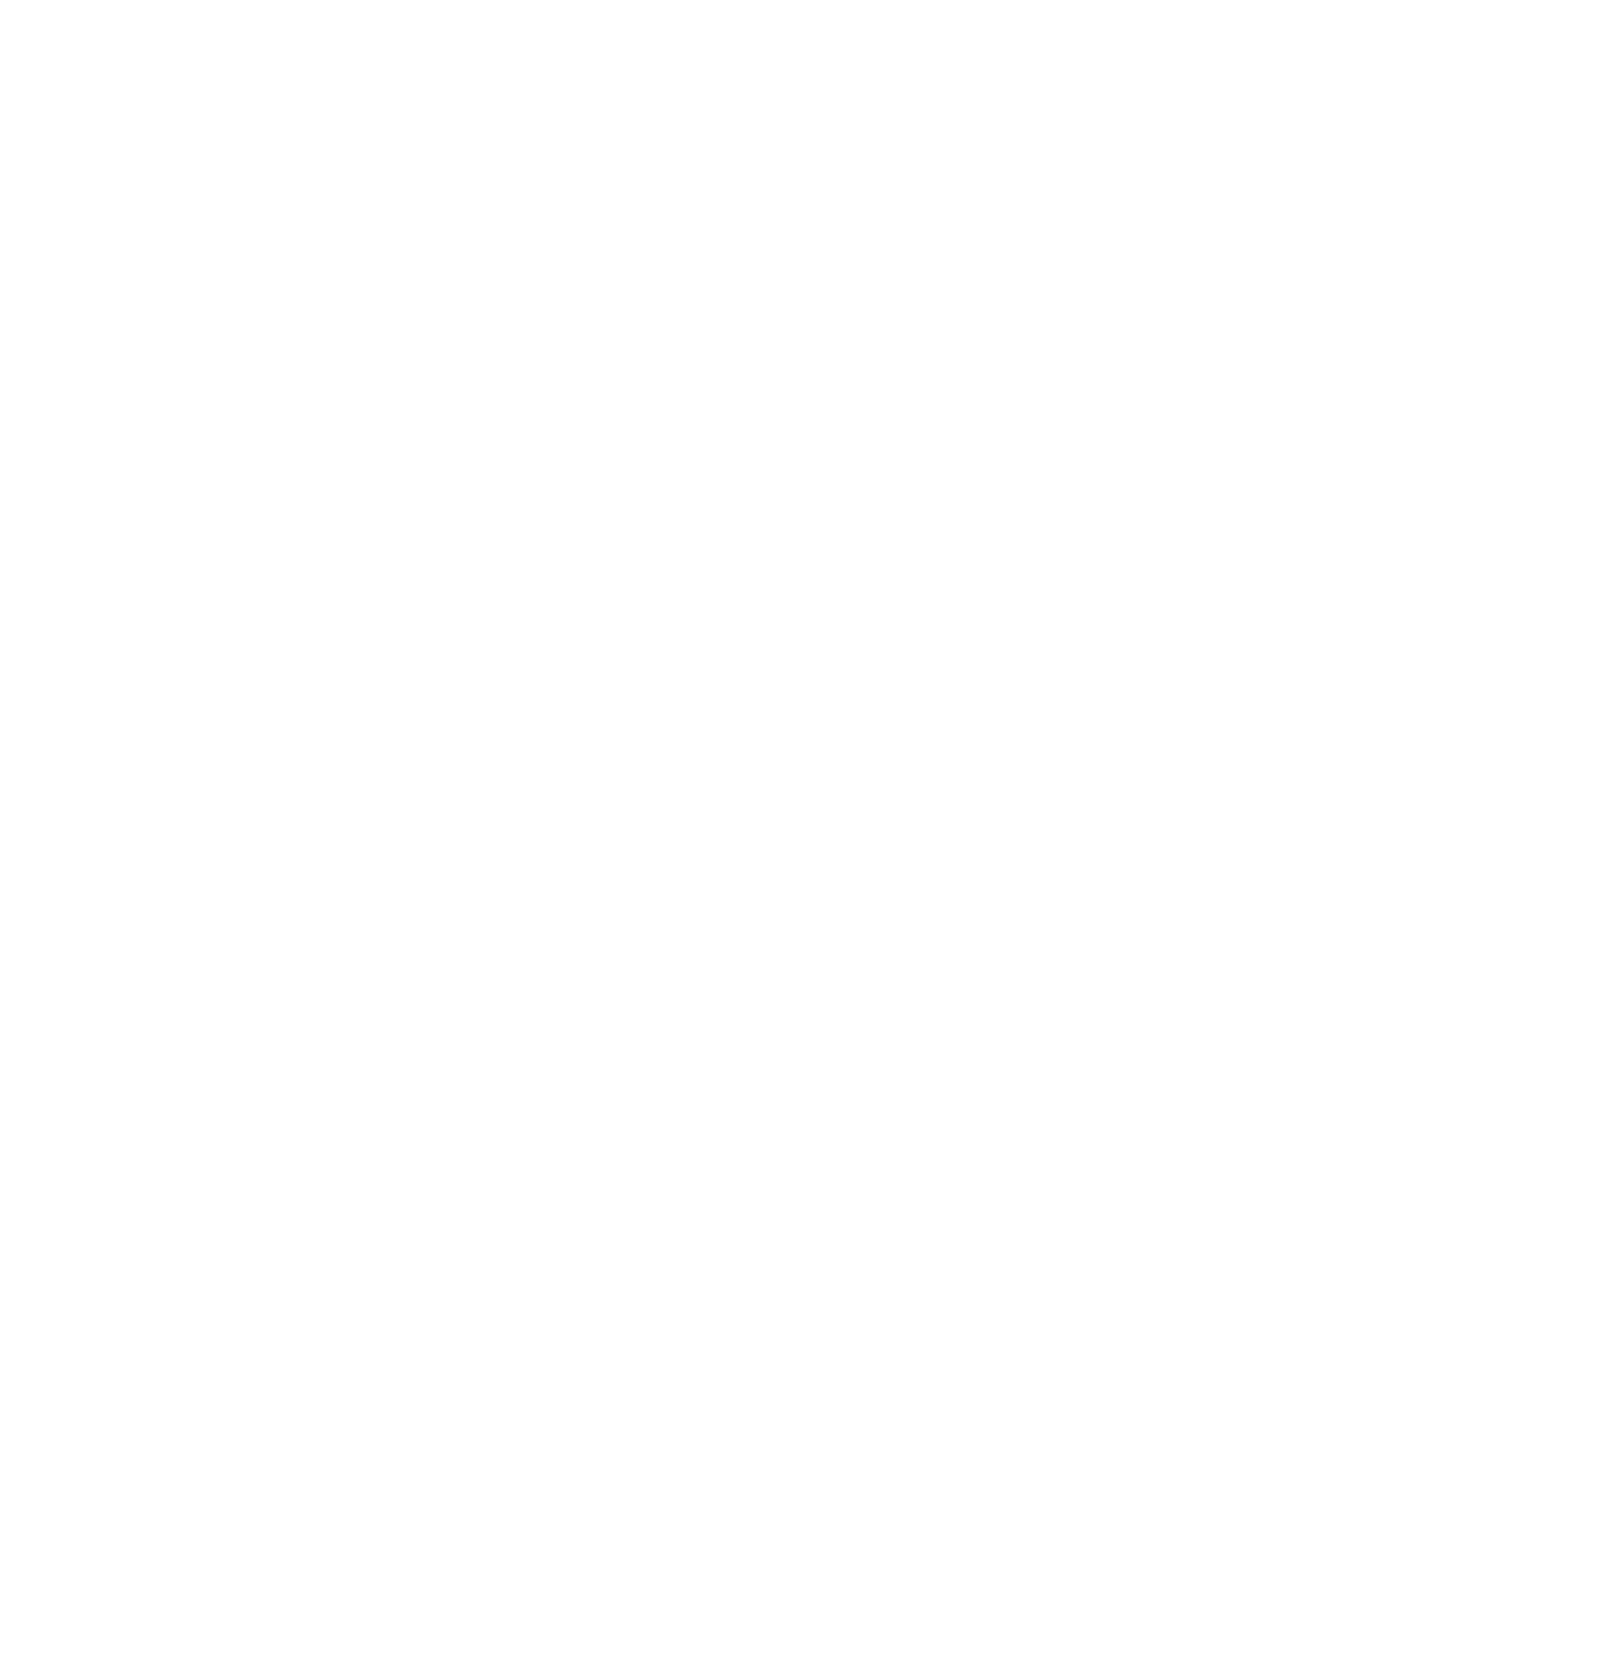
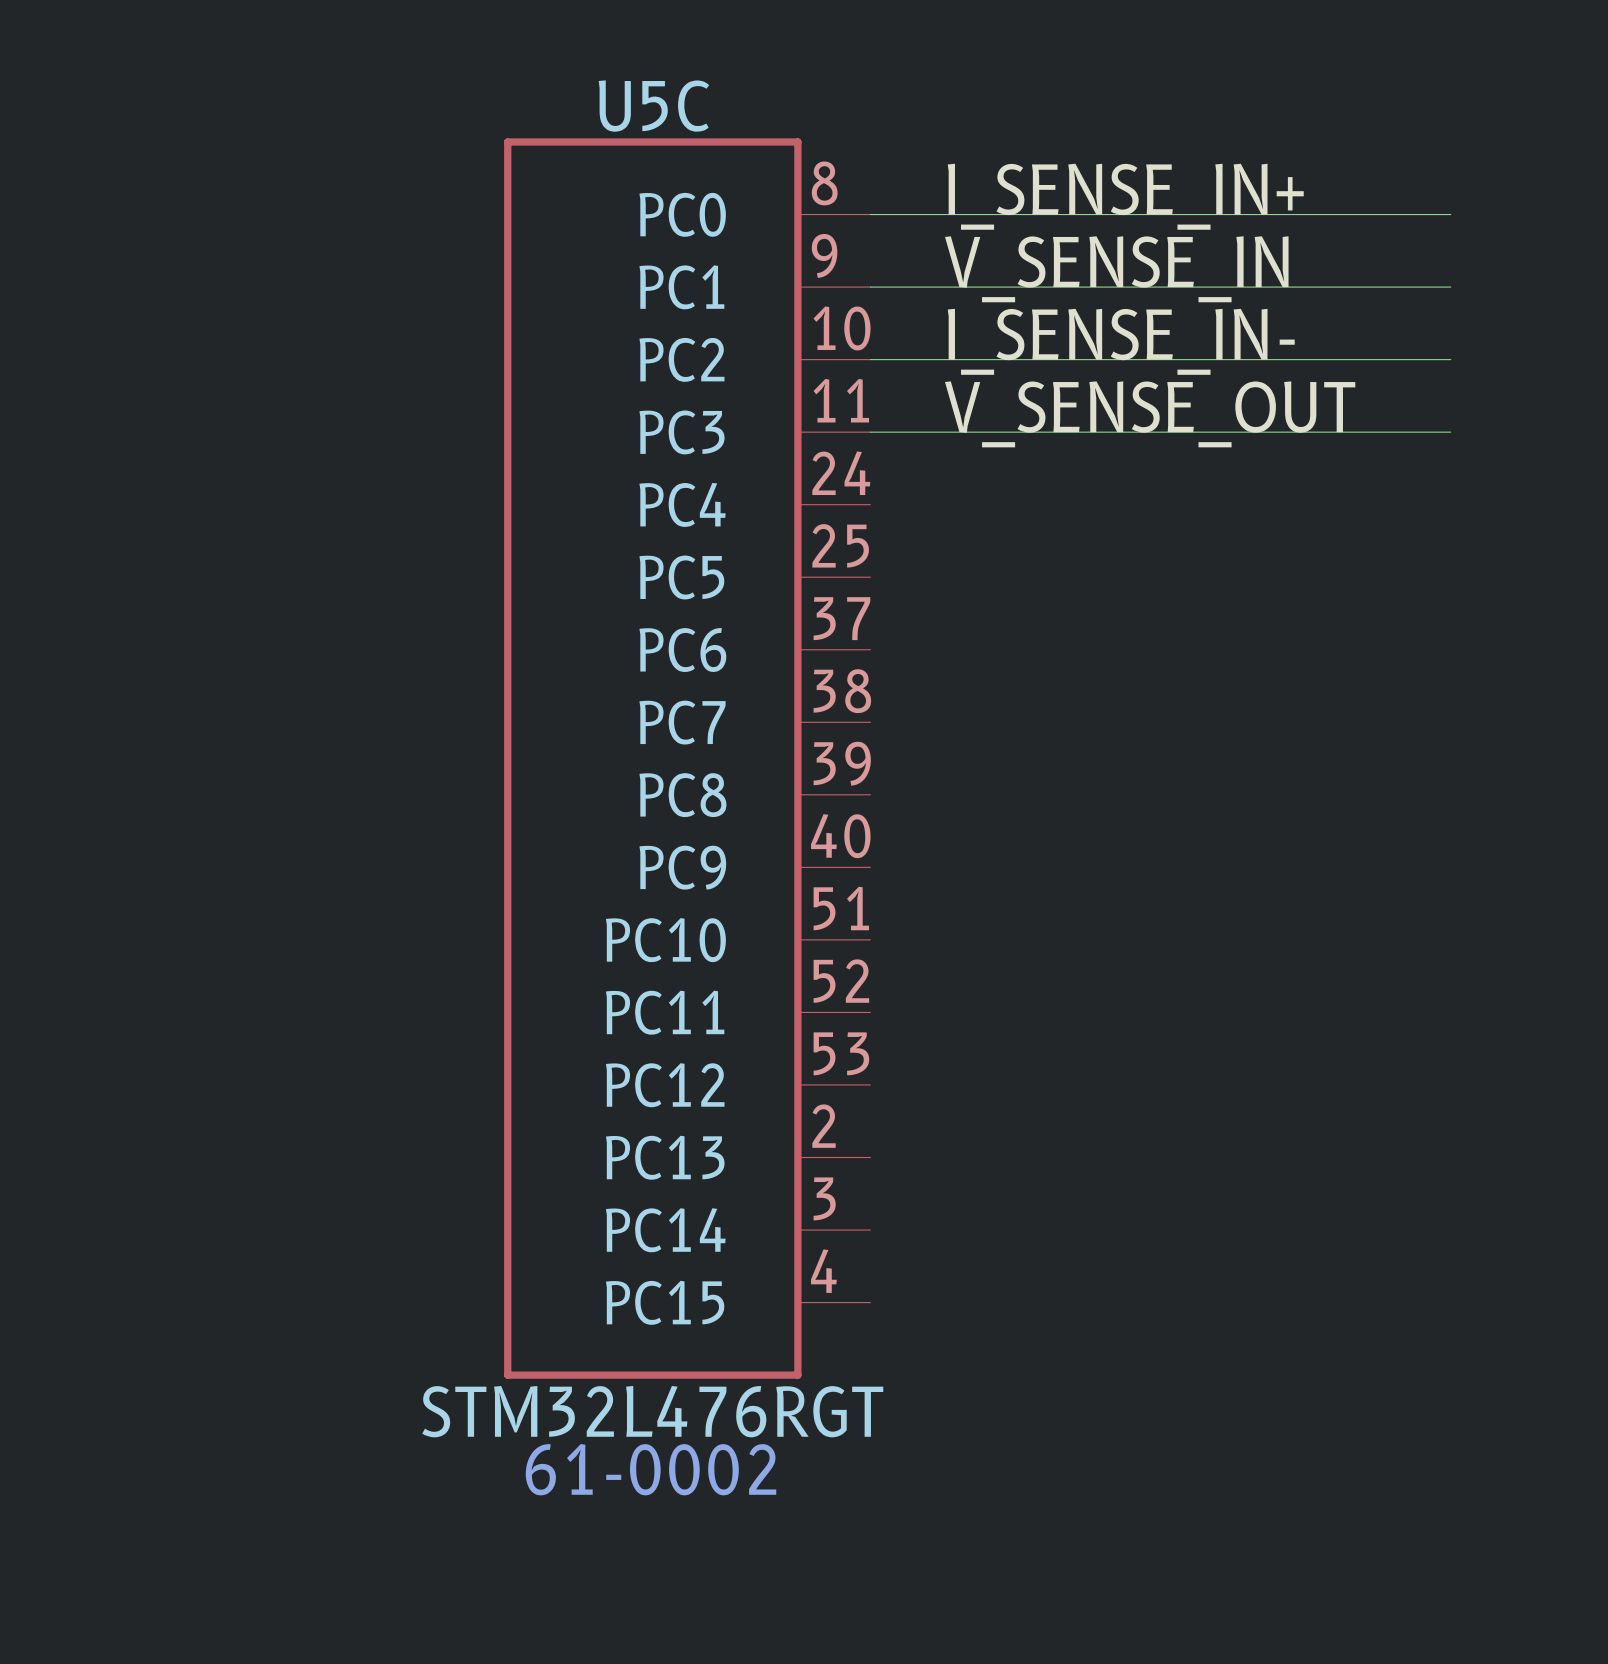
label: none -> I_SENSE_IN+ (1125, 196)
wire: none -> (870, 214) (1450, 214)
label: none -> V_SENSE_IN (1116, 269)
wire: none -> (870, 287) (1450, 287)
label: none -> I_SENSE_IN- (1121, 341)
wire: none -> (870, 359) (1450, 359)
label: none -> V_SENSE_OUT (1150, 414)
wire: none -> (870, 432) (1450, 432)
U5C: none -> STM32L476RGT (687, 758)

